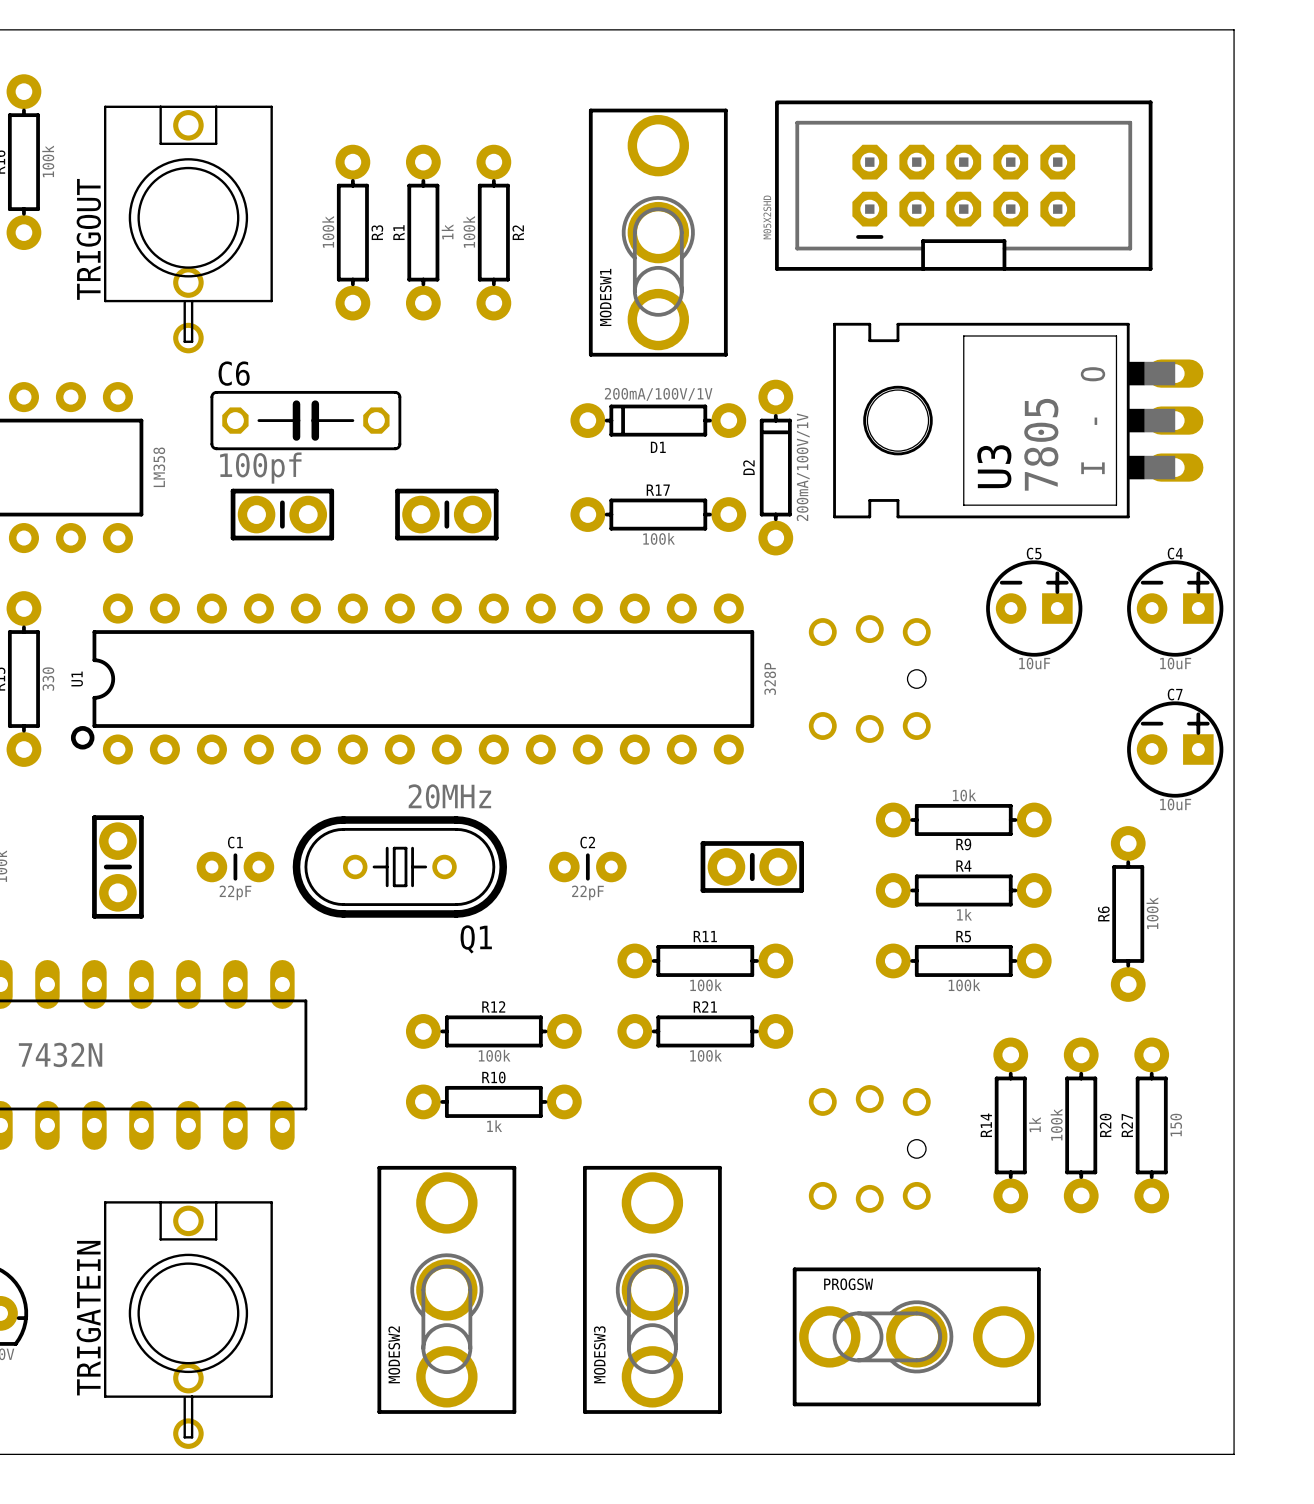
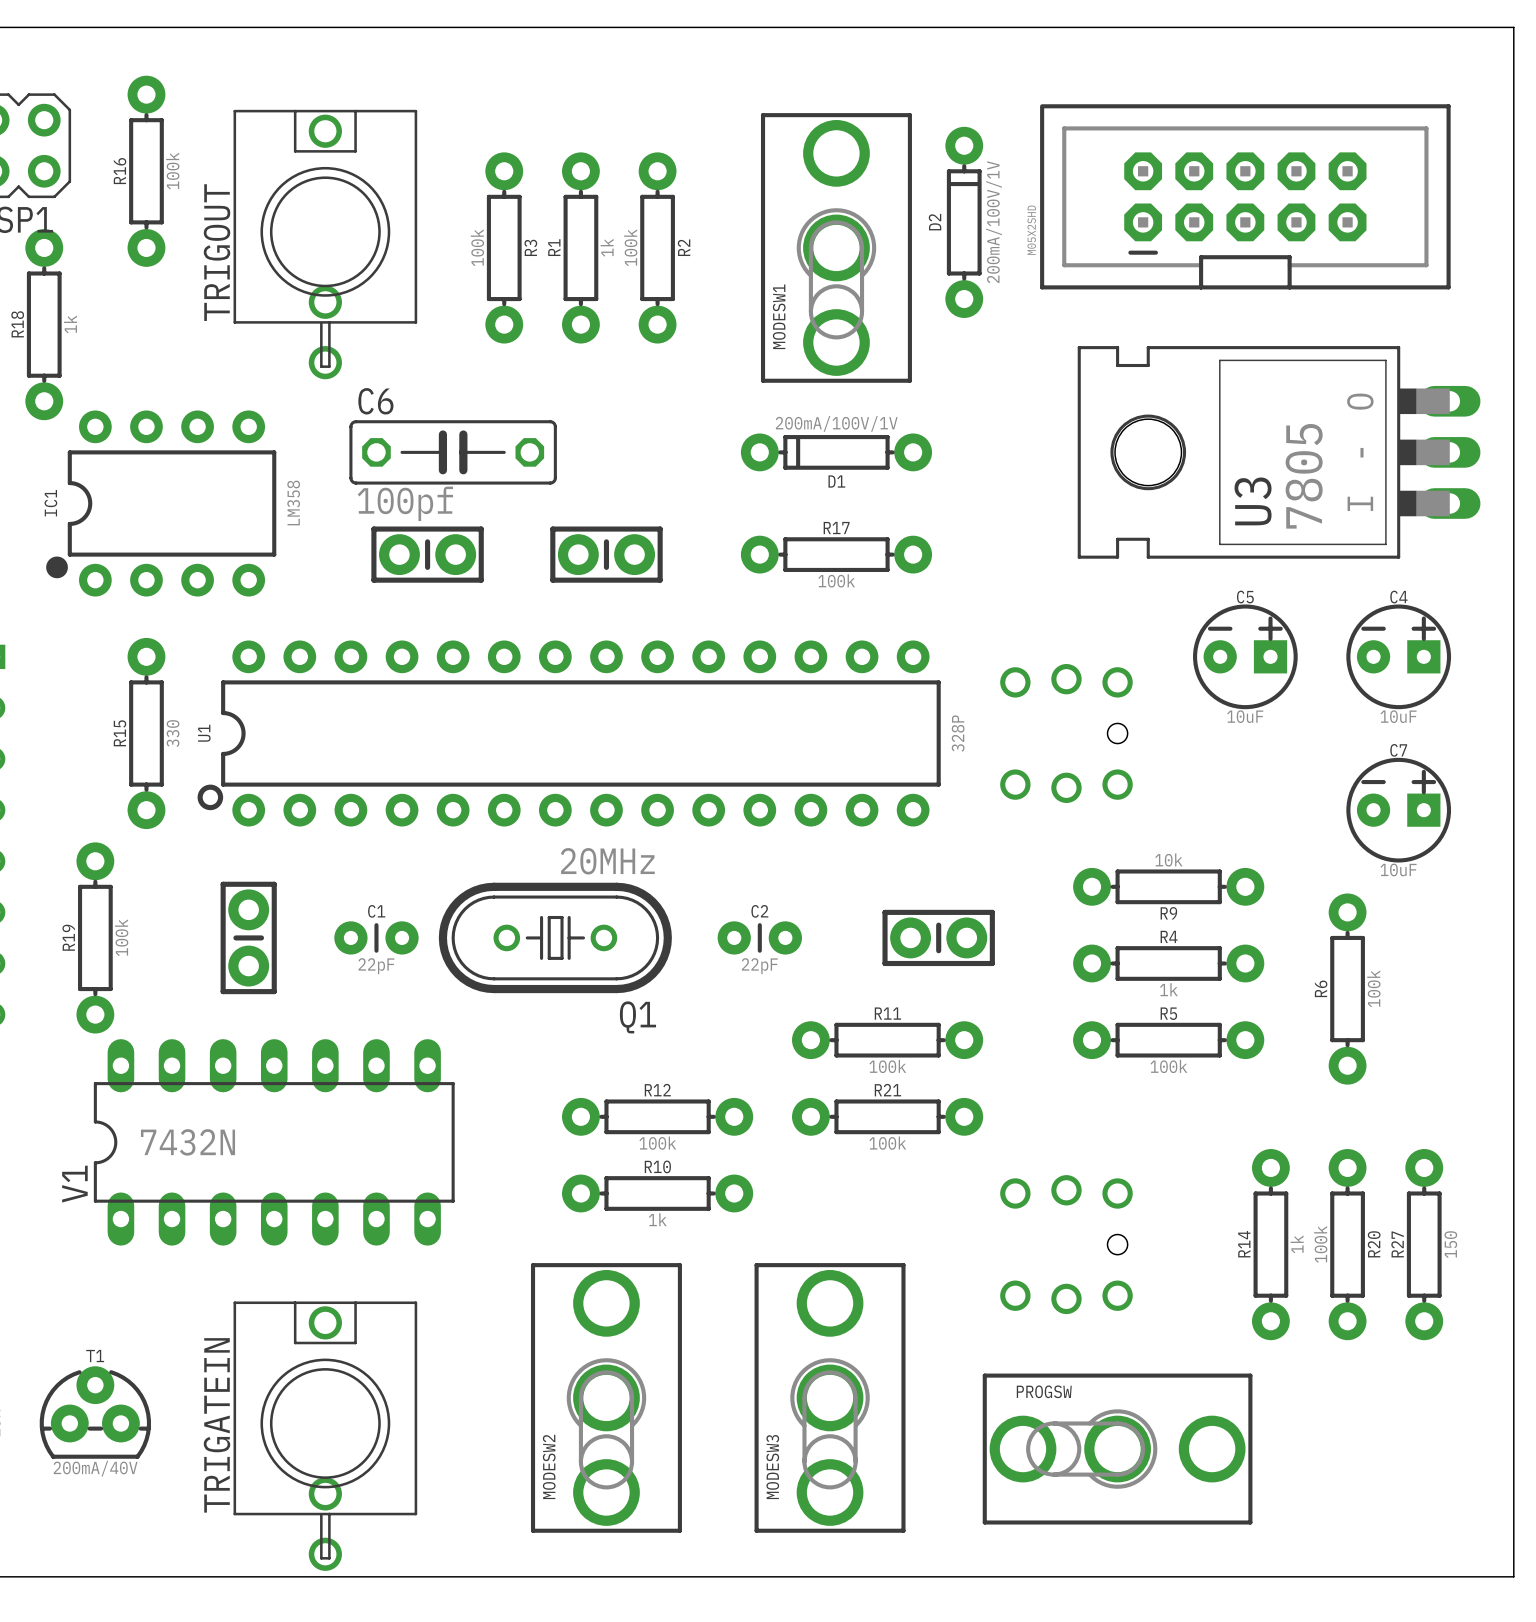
board edge: (1234, 29) (1234, 1454) -> (1462, 27) (1513, 27) (1513, 1576) (1462, 1576)
part position: (963, 185) -> (1245, 196)
U3 position: (1018, 420) -> (1279, 452)
D2 position: (775, 467) -> (964, 222)
R14 position: (1010, 1125) -> (1270, 1244)
R20 position: (1081, 1125) -> (1347, 1244)
R27 position: (1151, 1125) -> (1424, 1244)

